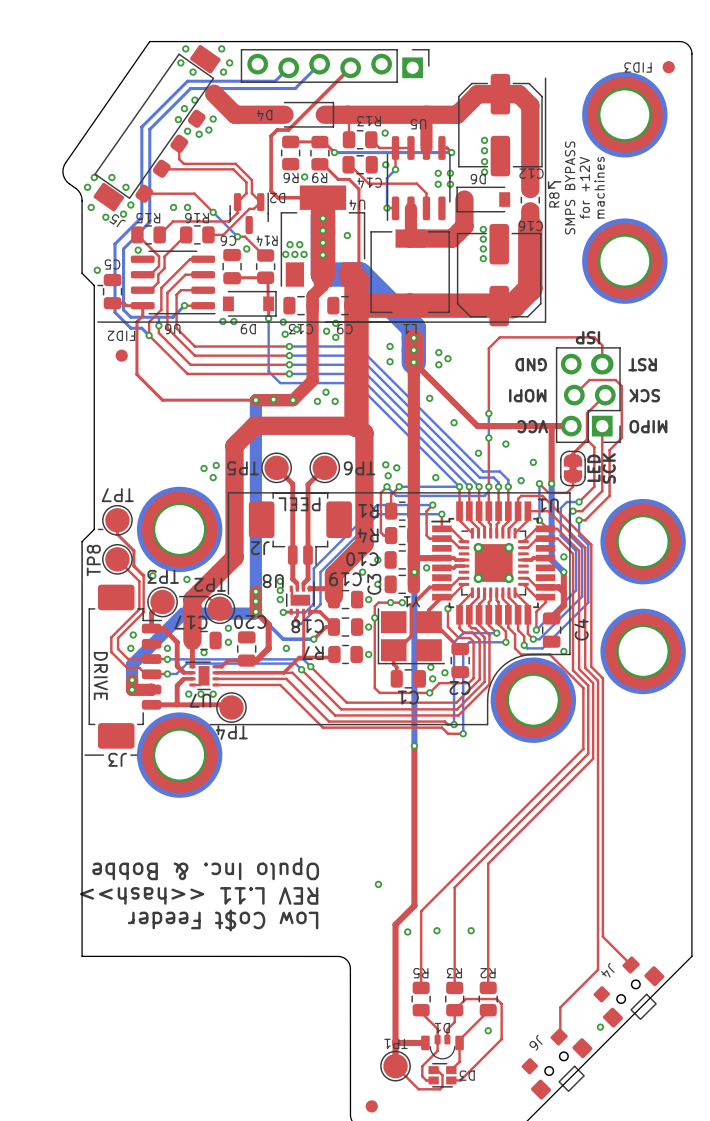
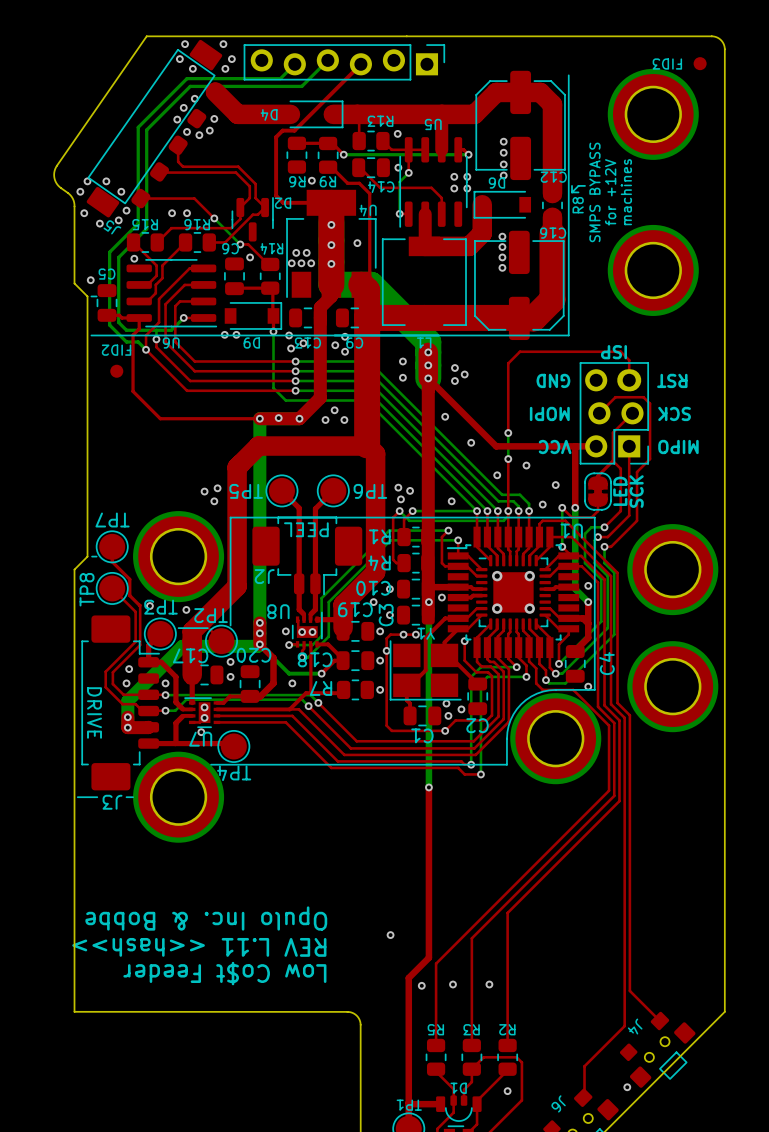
via: (322, 230) -> none
via: none -> (331, 245)
via: (322, 242) -> none
via: (280, 581) -> none
via: (280, 590) -> none
via: none -> (302, 632)
via: none -> (312, 632)
via: (204, 652) -> none
via: none -> (204, 707)
via: none -> (204, 717)
via: (188, 694) -> none
via: (213, 694) -> none

